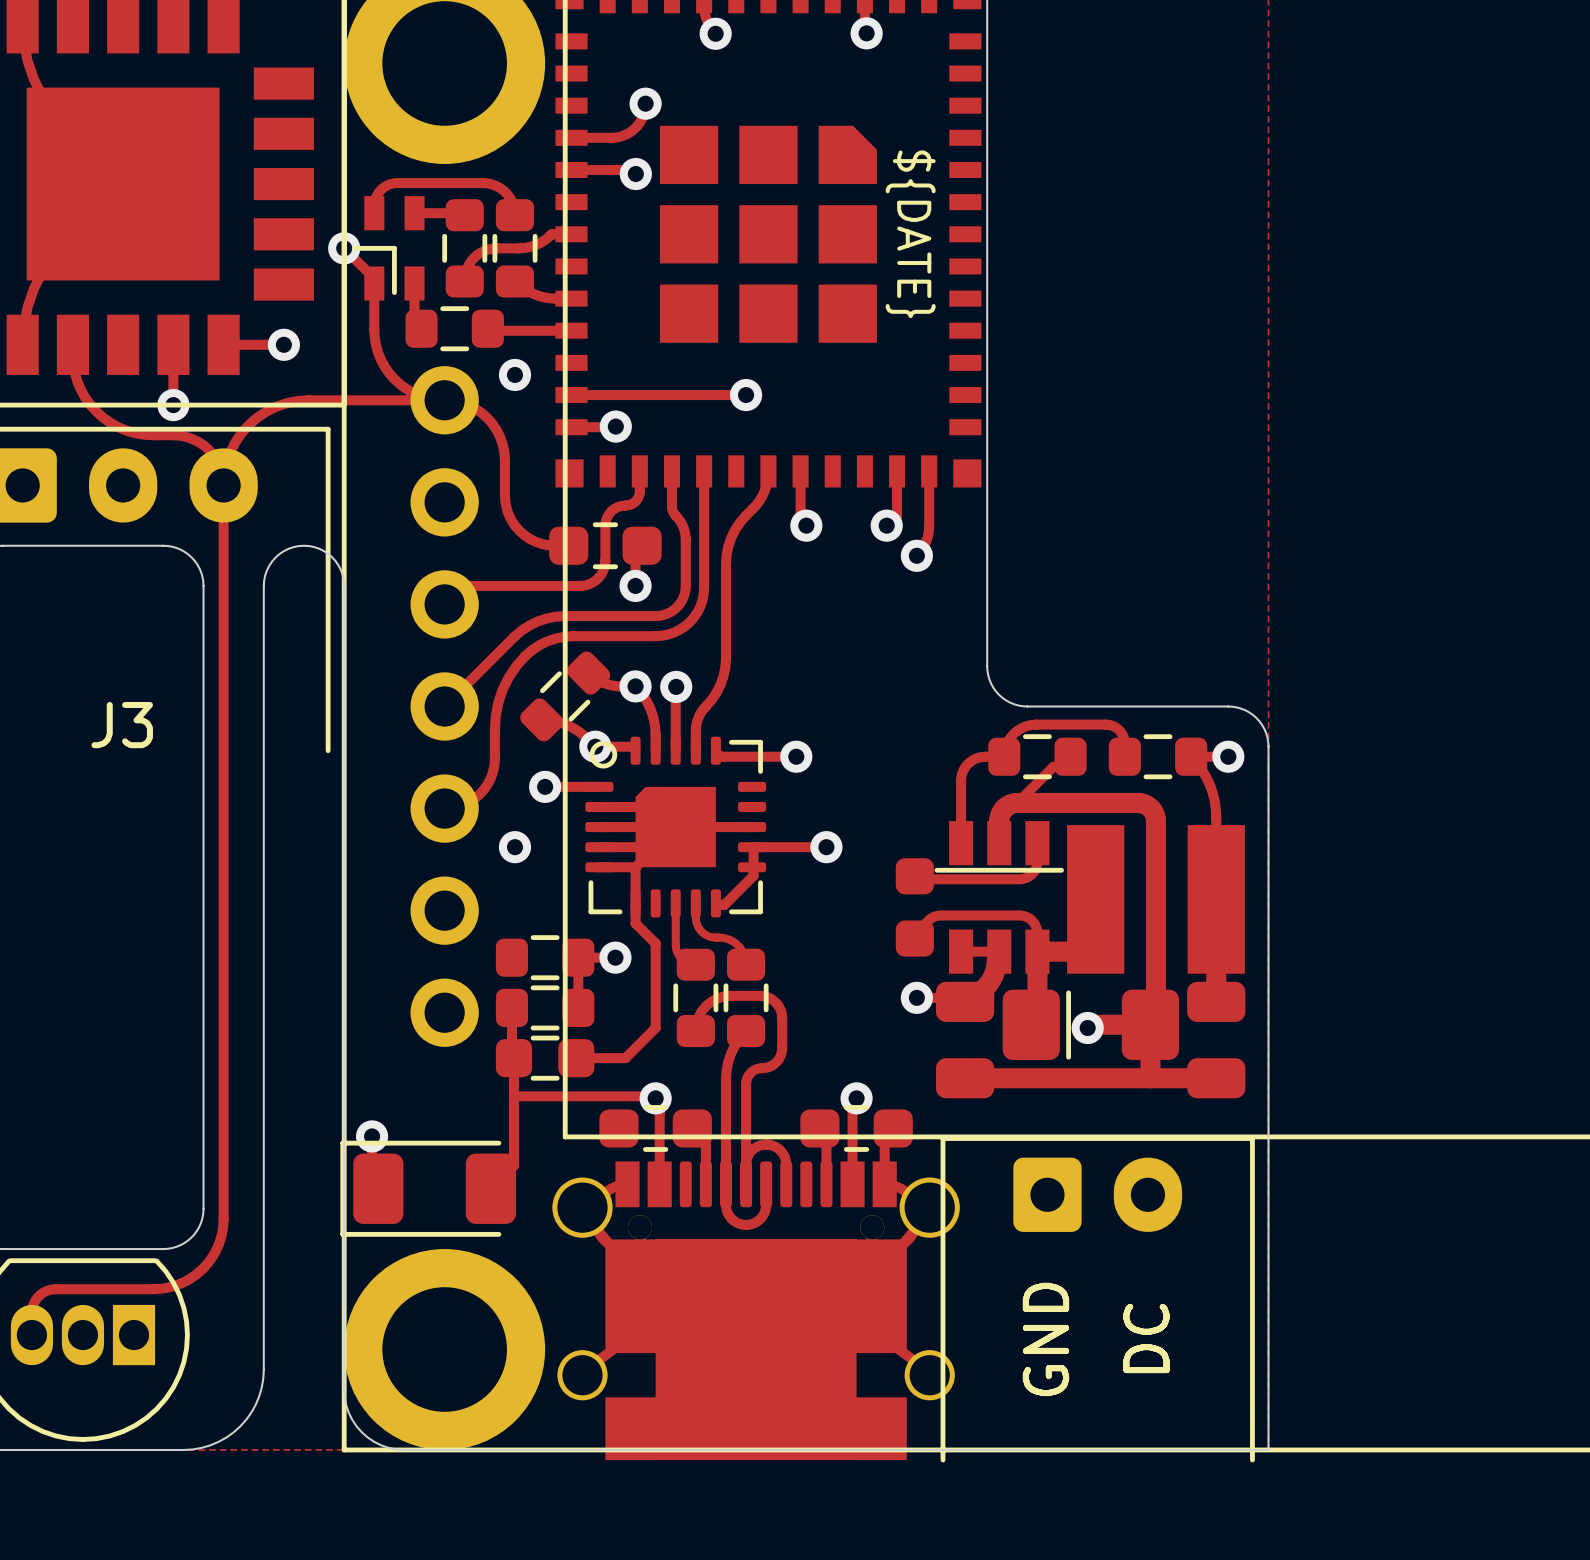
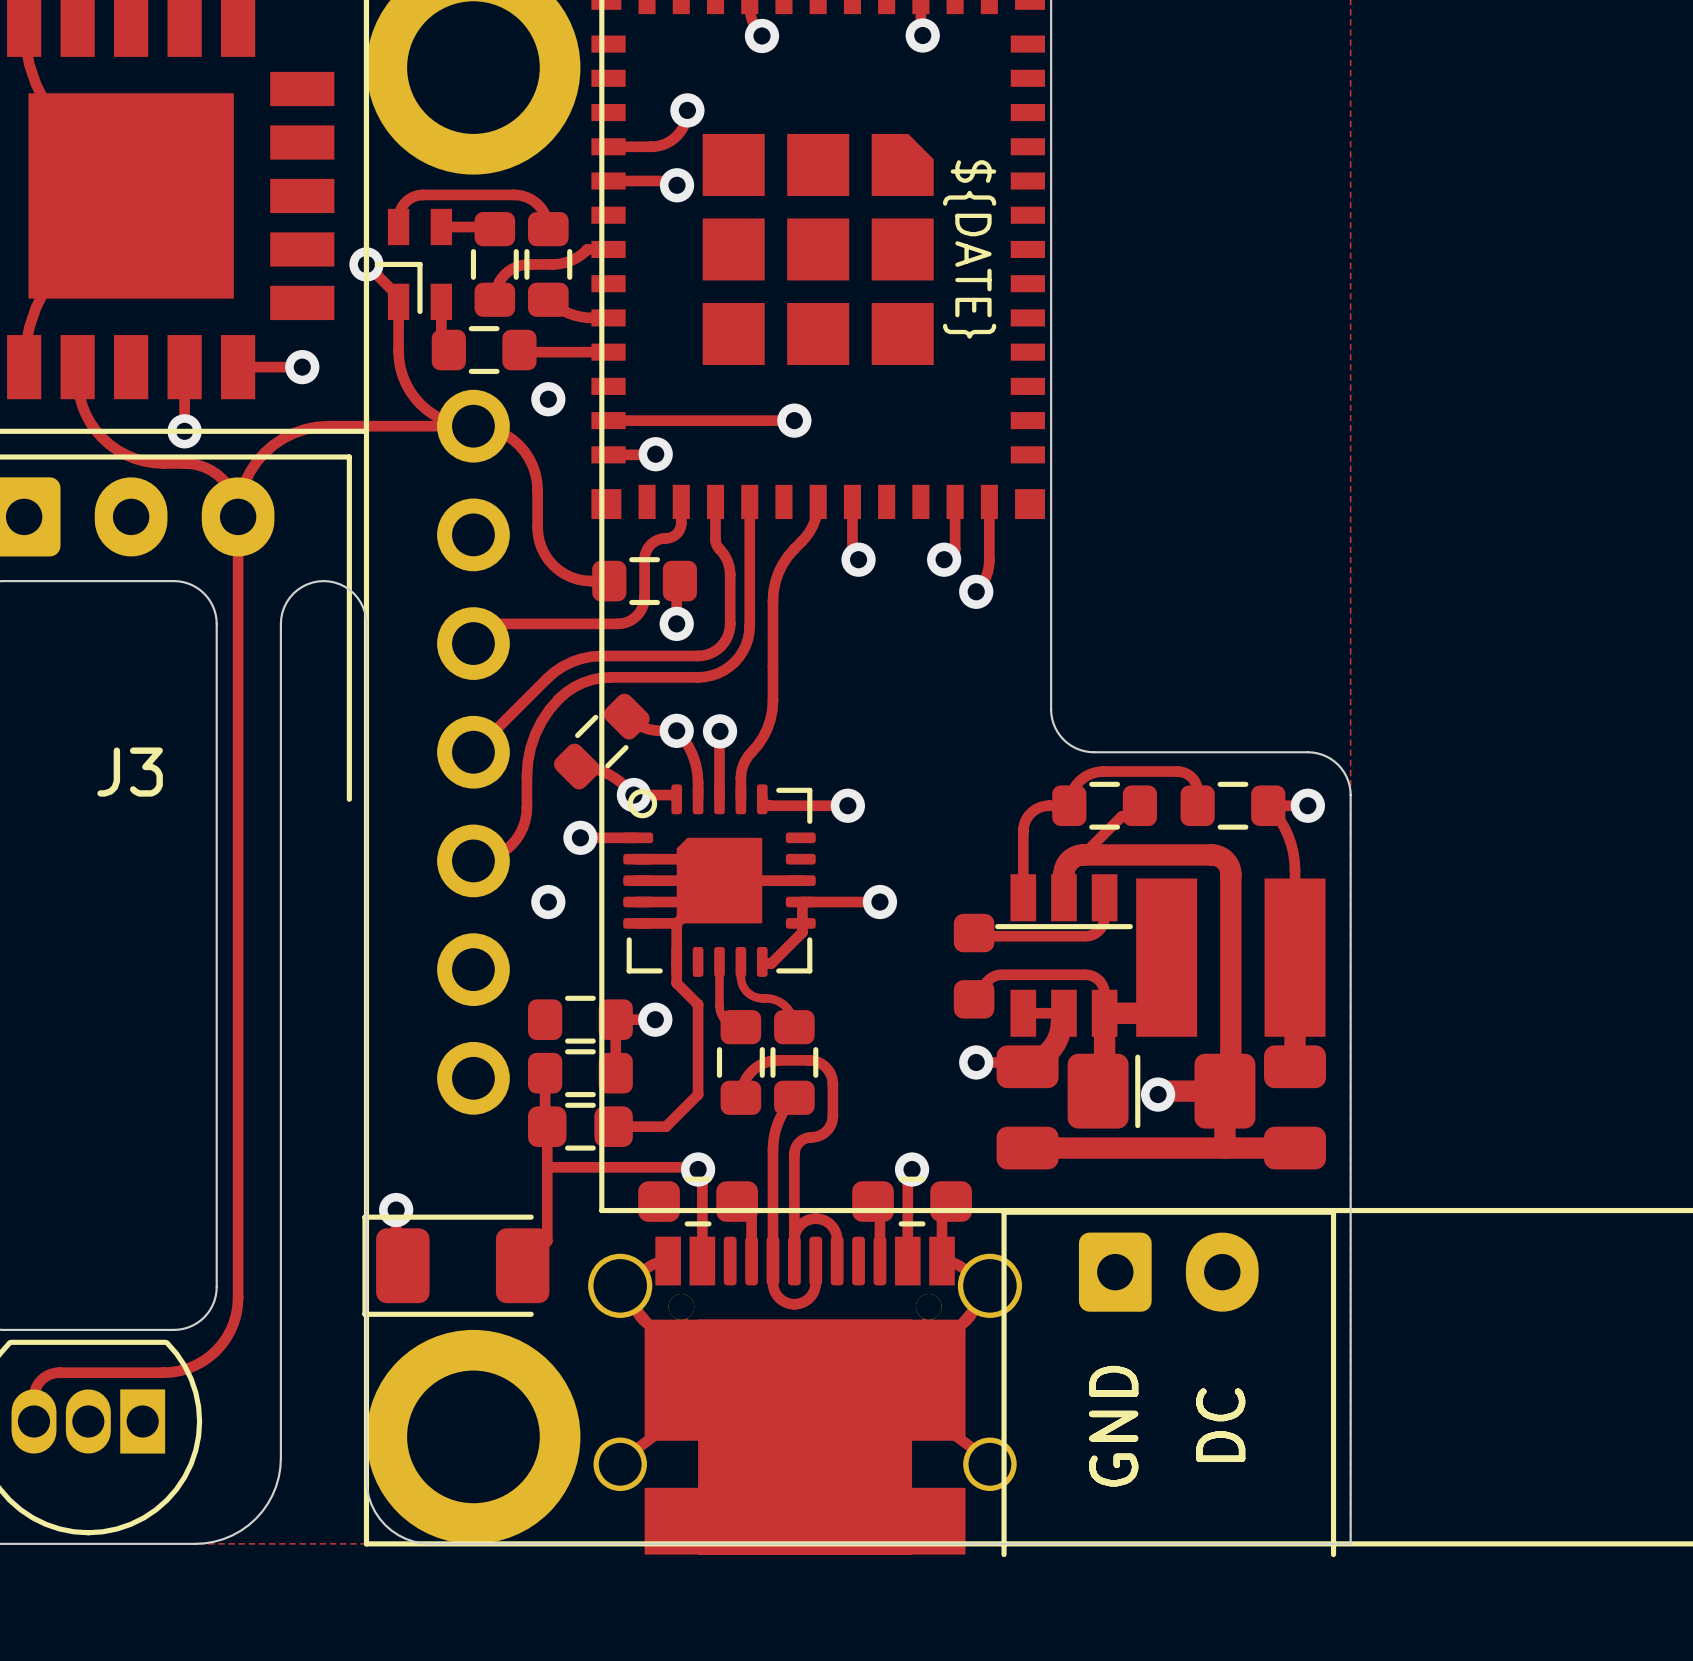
part footprint: [549, 522, 662, 570] -> [592, 557, 698, 606]

